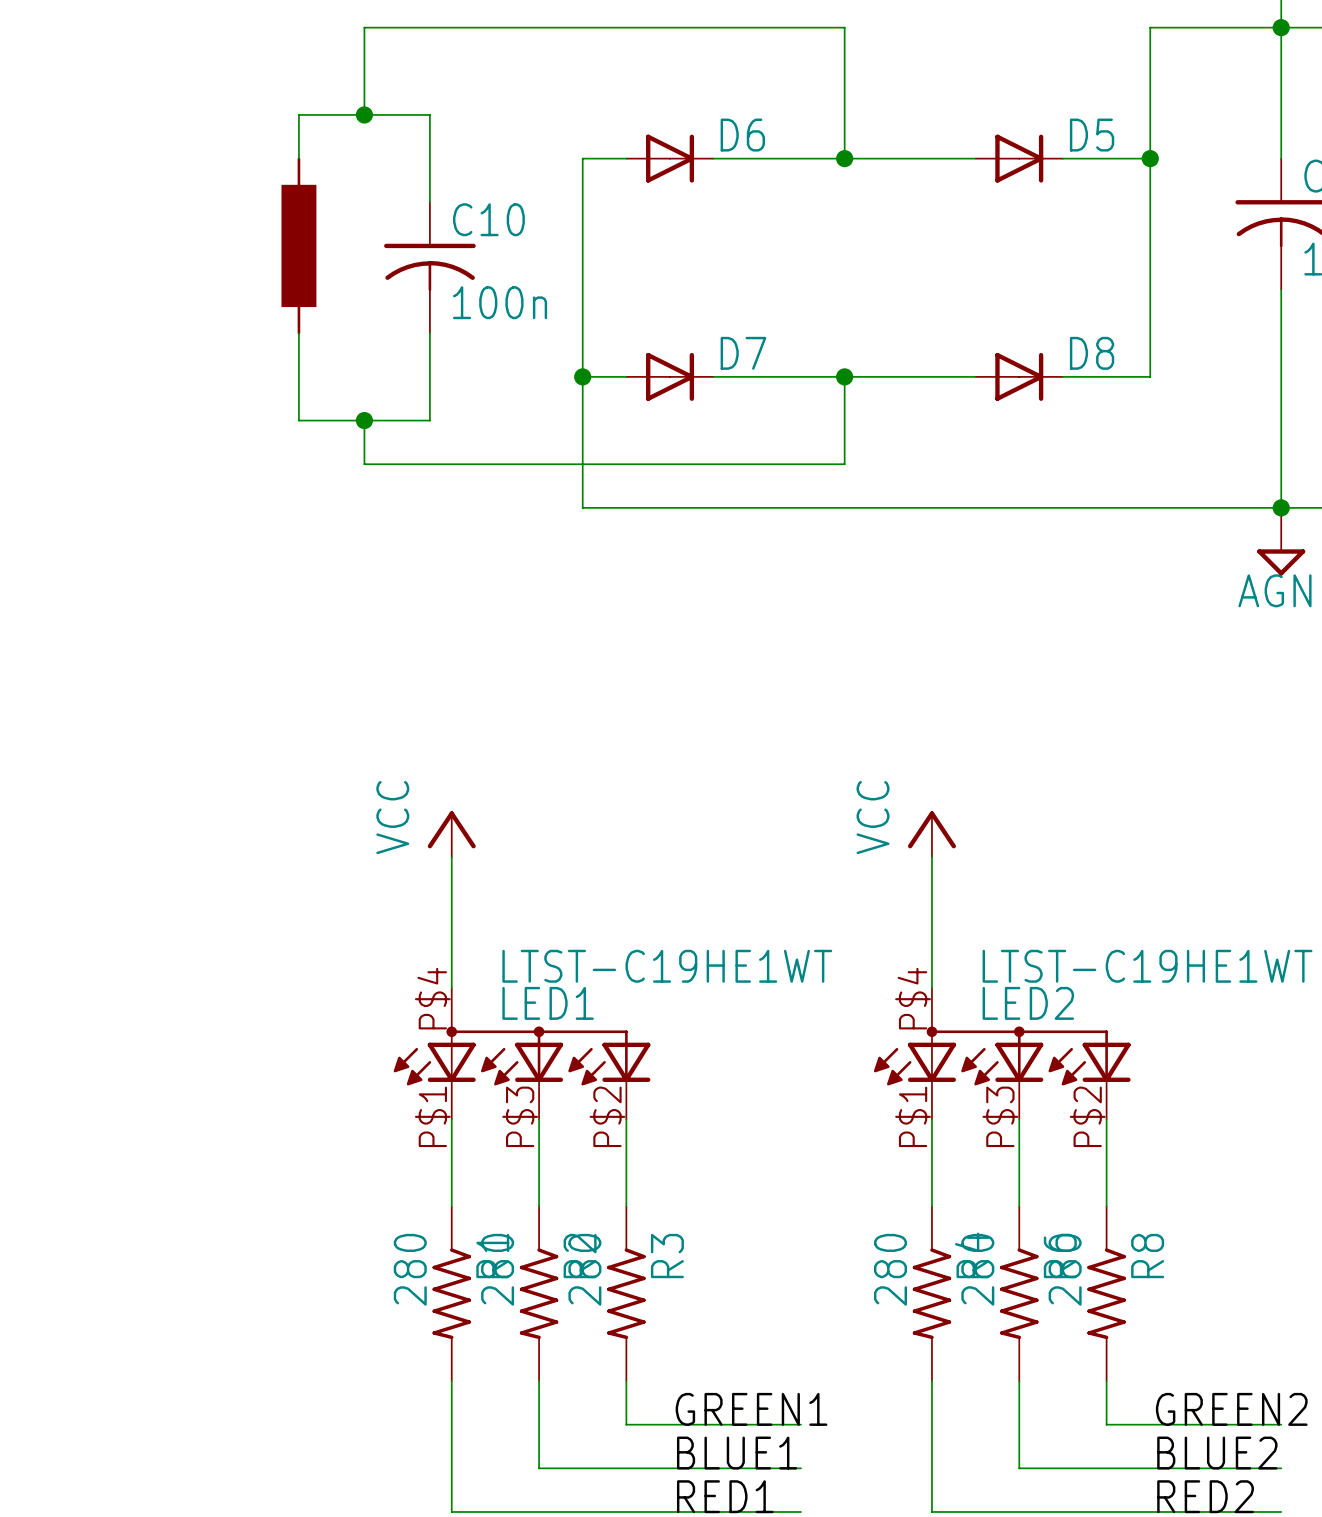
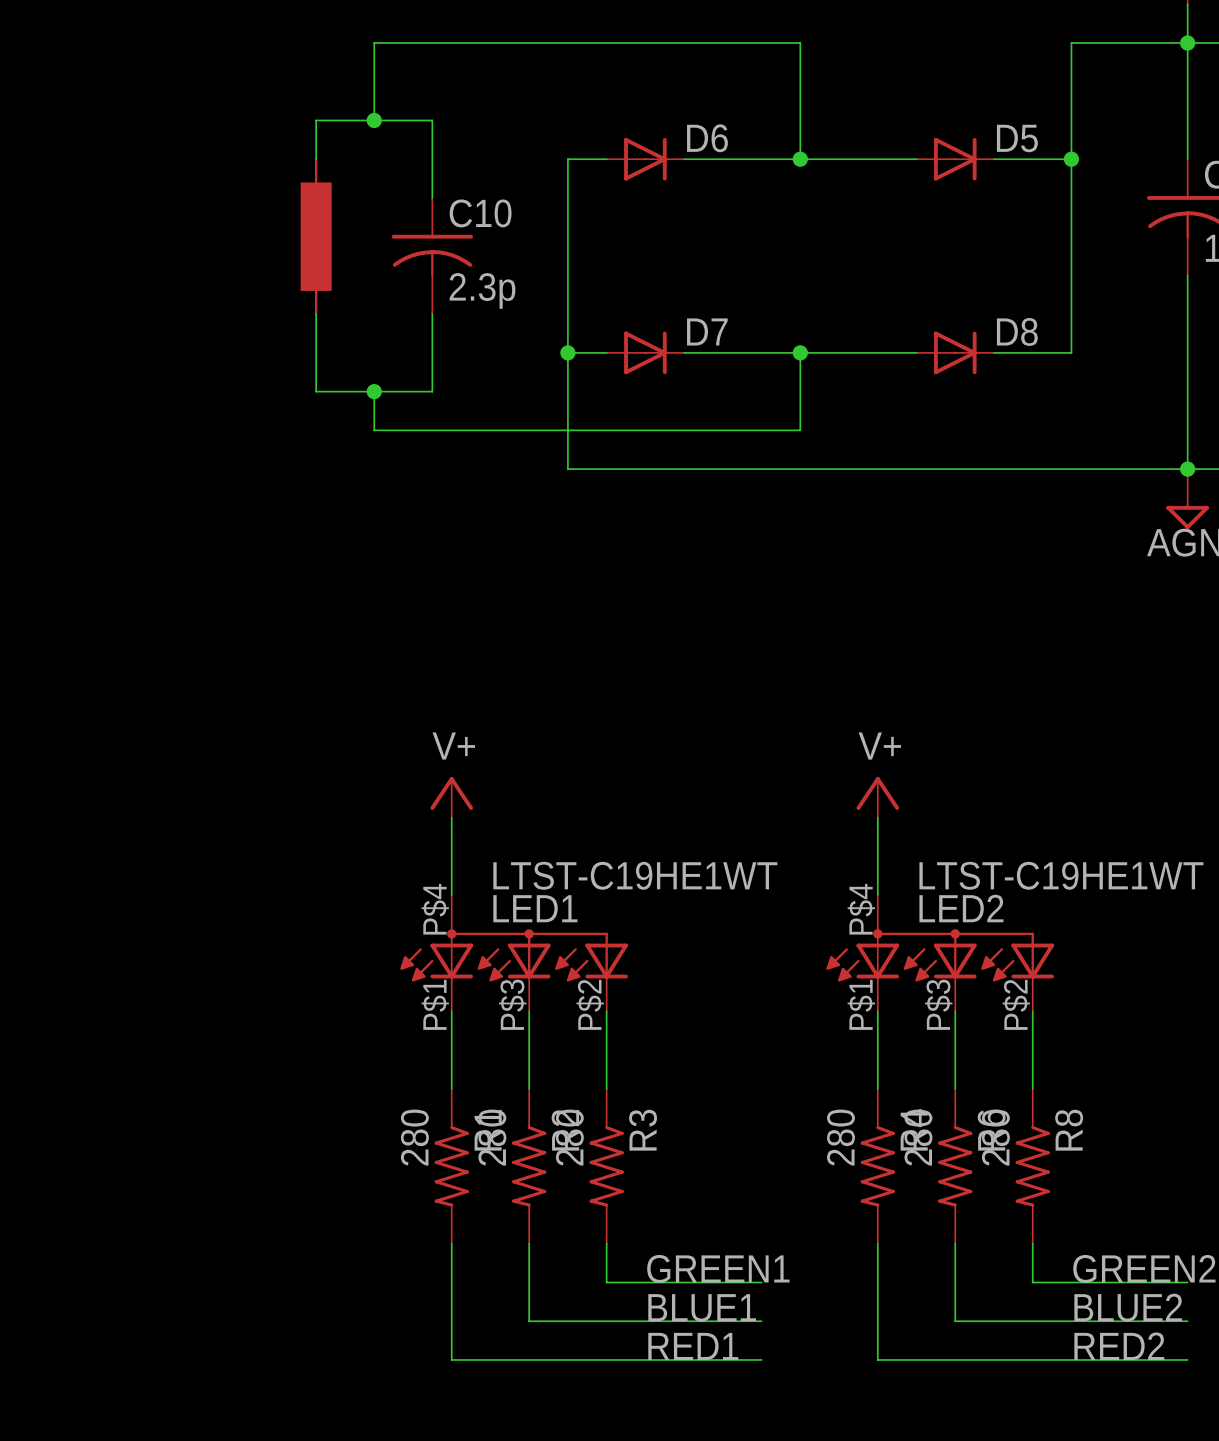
C10 value: 100n (500, 302) -> 2.3p (482, 290)
power symbol: VCC (451, 834) -> none
power symbol: VCC (931, 834) -> none
power symbol: none -> V+ (451, 797)
power symbol: none -> V+ (877, 797)

